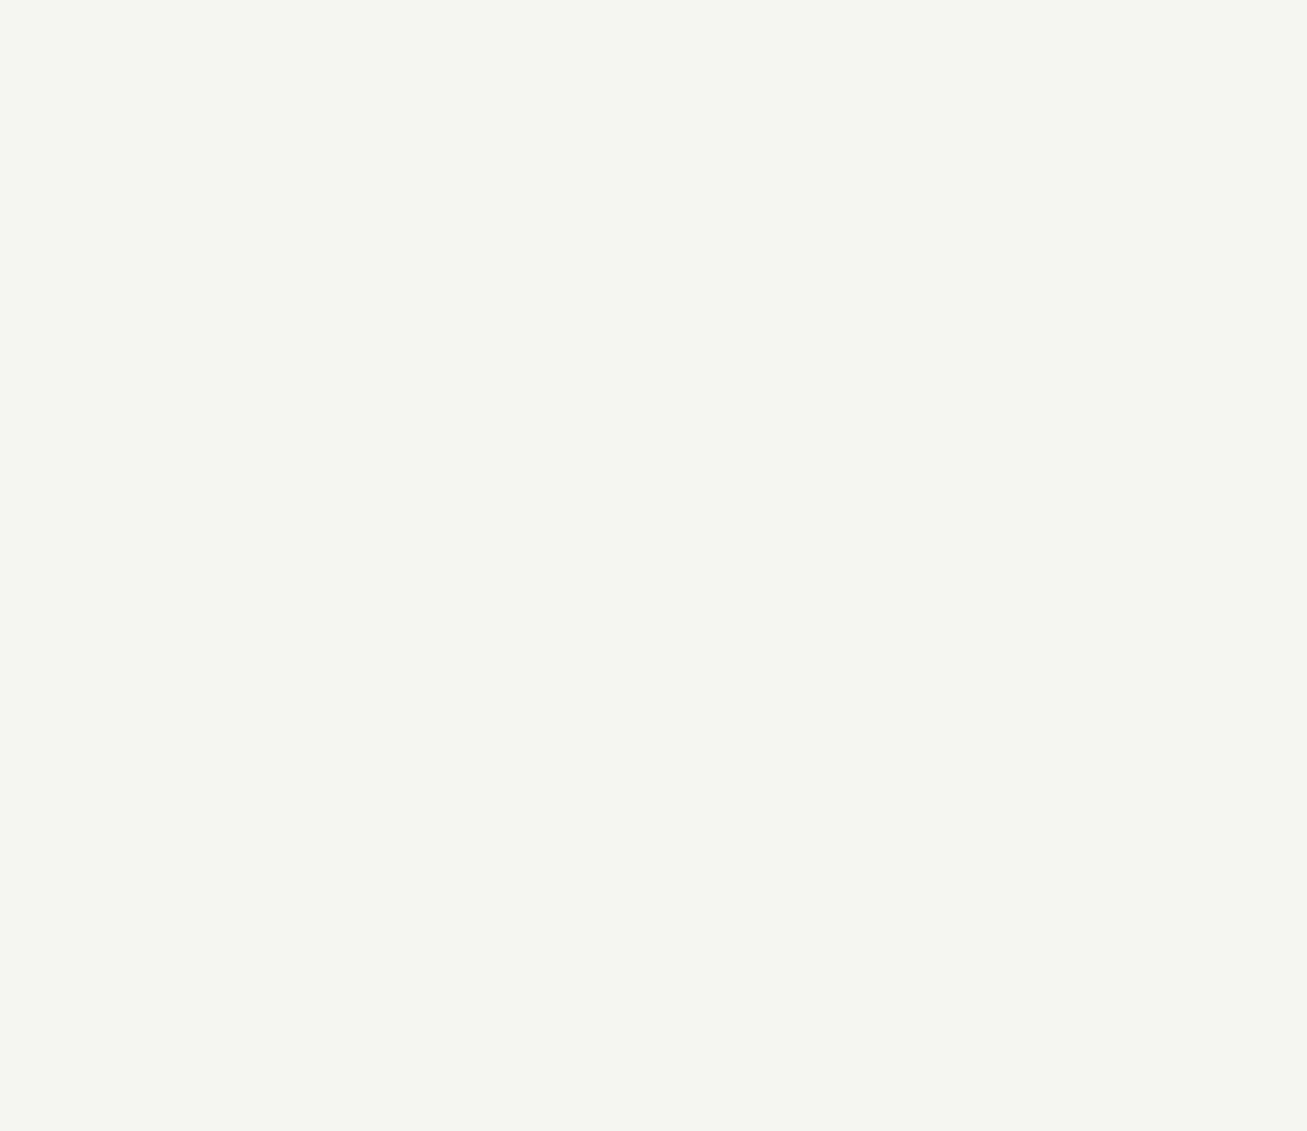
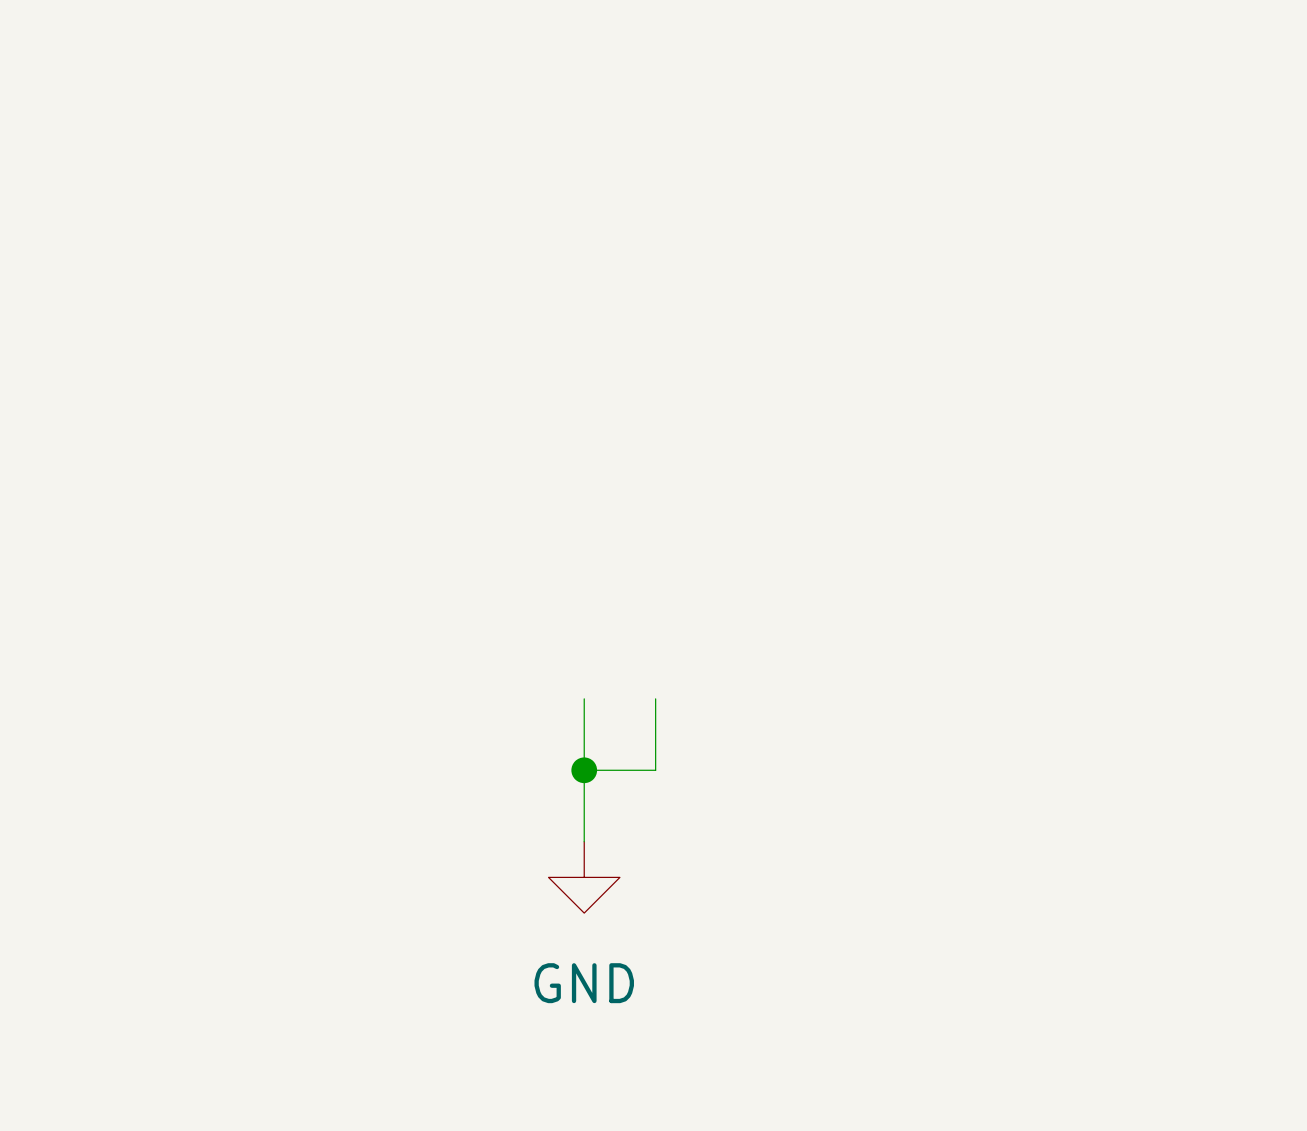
wire: none -> (584, 698) (584, 841)
wire: none -> (655, 698) (655, 770) (584, 770)
junction: none -> (584, 770)
power symbol: none -> GND (584, 877)

